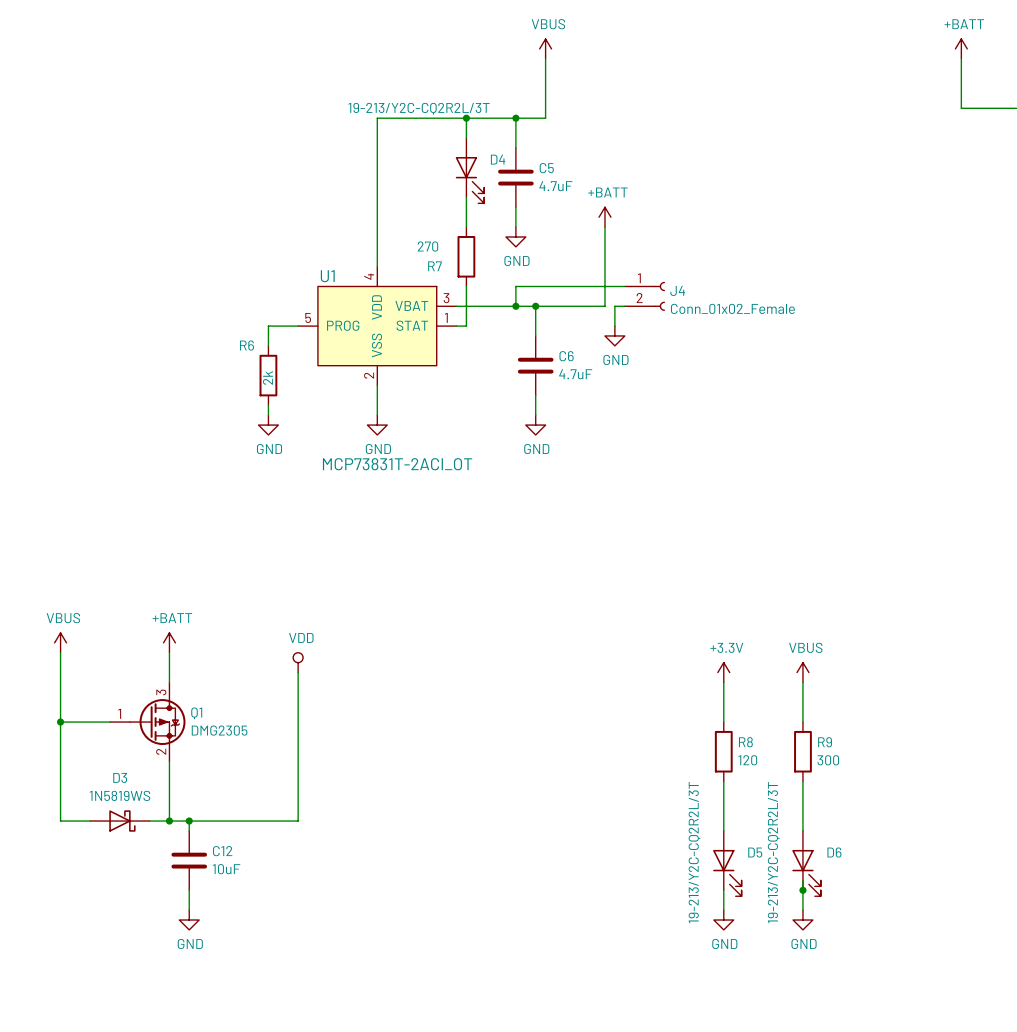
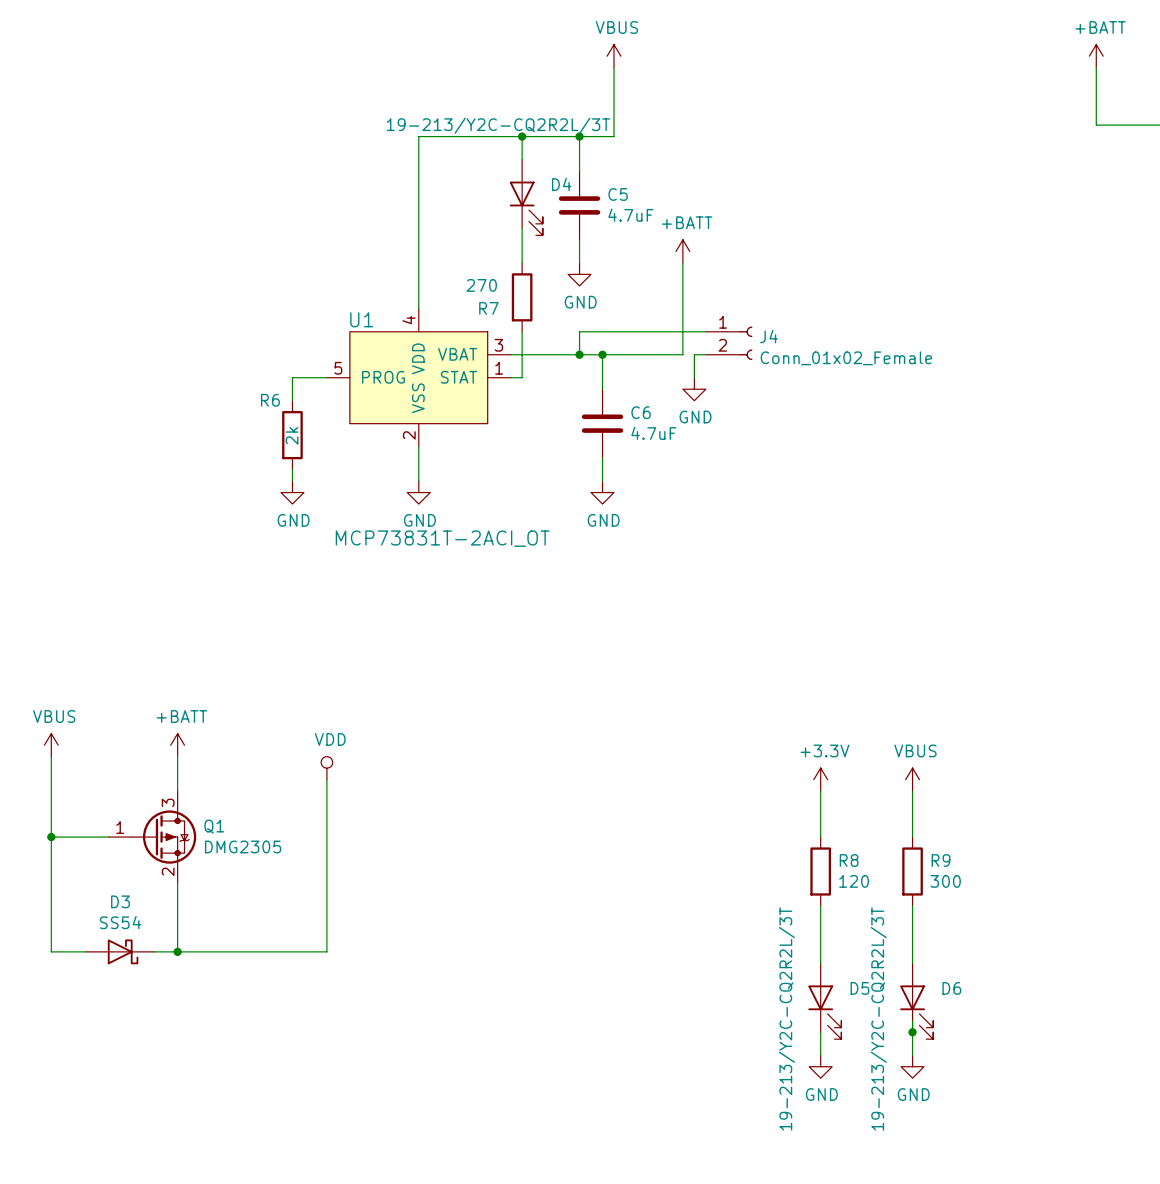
D3 value: 1N5819WS (119, 795) -> SS54 (120, 922)
wire: (189, 821) (189, 830) -> none
junction: (189, 821) -> none
C12: 10uF (189, 860) -> none
wire: (189, 890) (189, 910) -> none
power symbol: GND (189, 920) -> none

